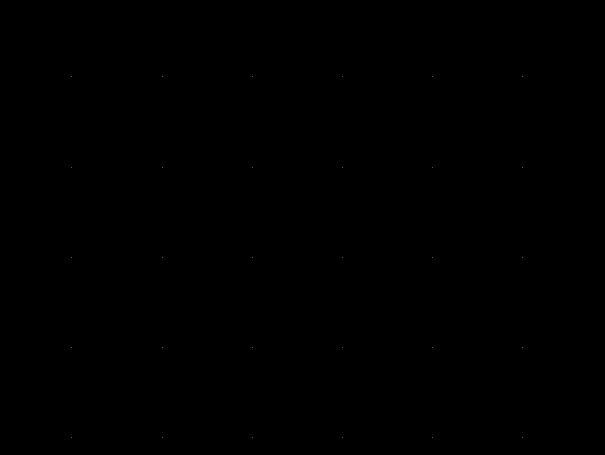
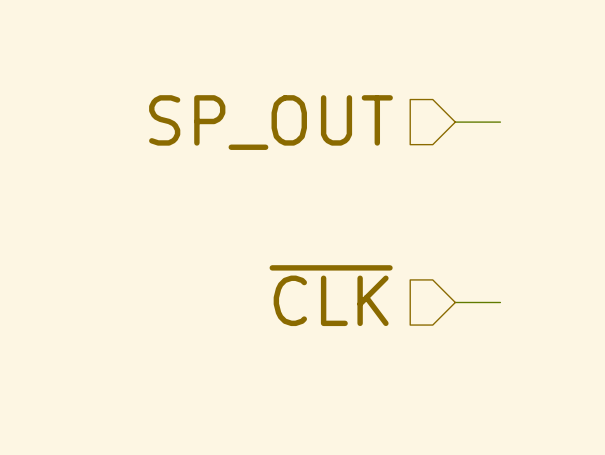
wire: none -> (455, 122) (500, 122)
hierarchical label: none -> SP_OUT (270, 122)
hierarchical label: none -> ~{CLK} (331, 295)
wire: none -> (455, 302) (500, 302)

